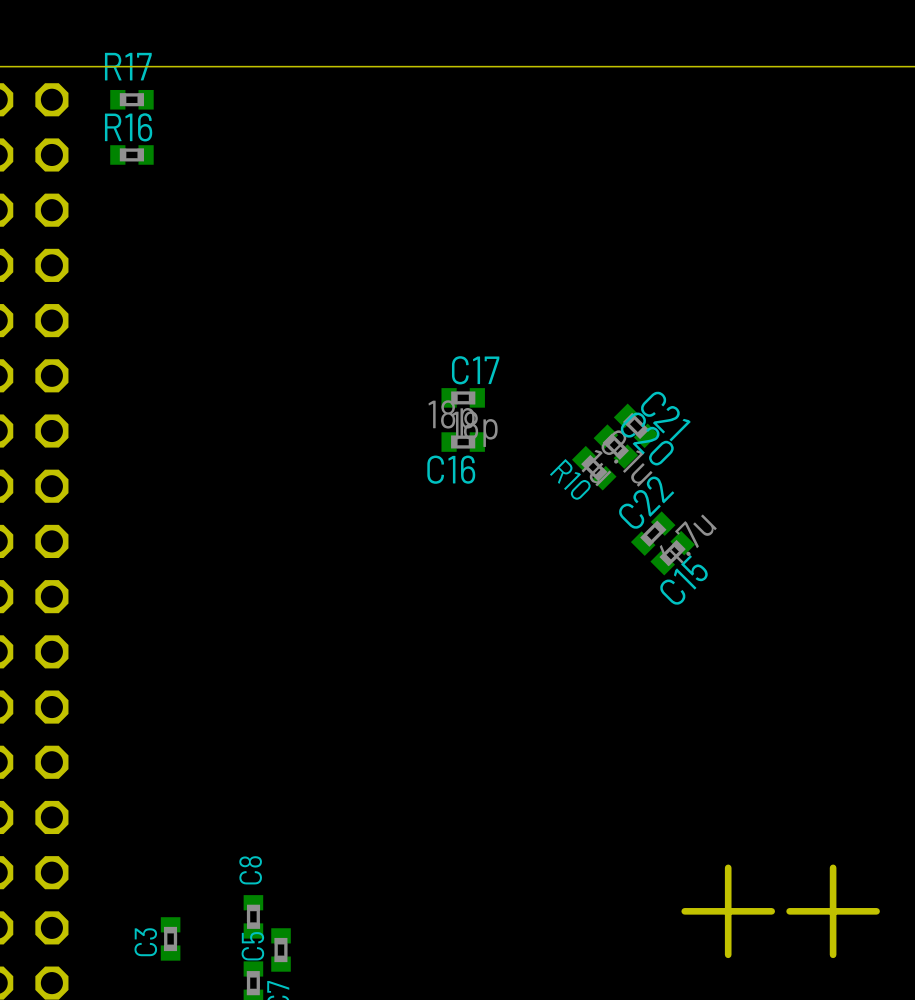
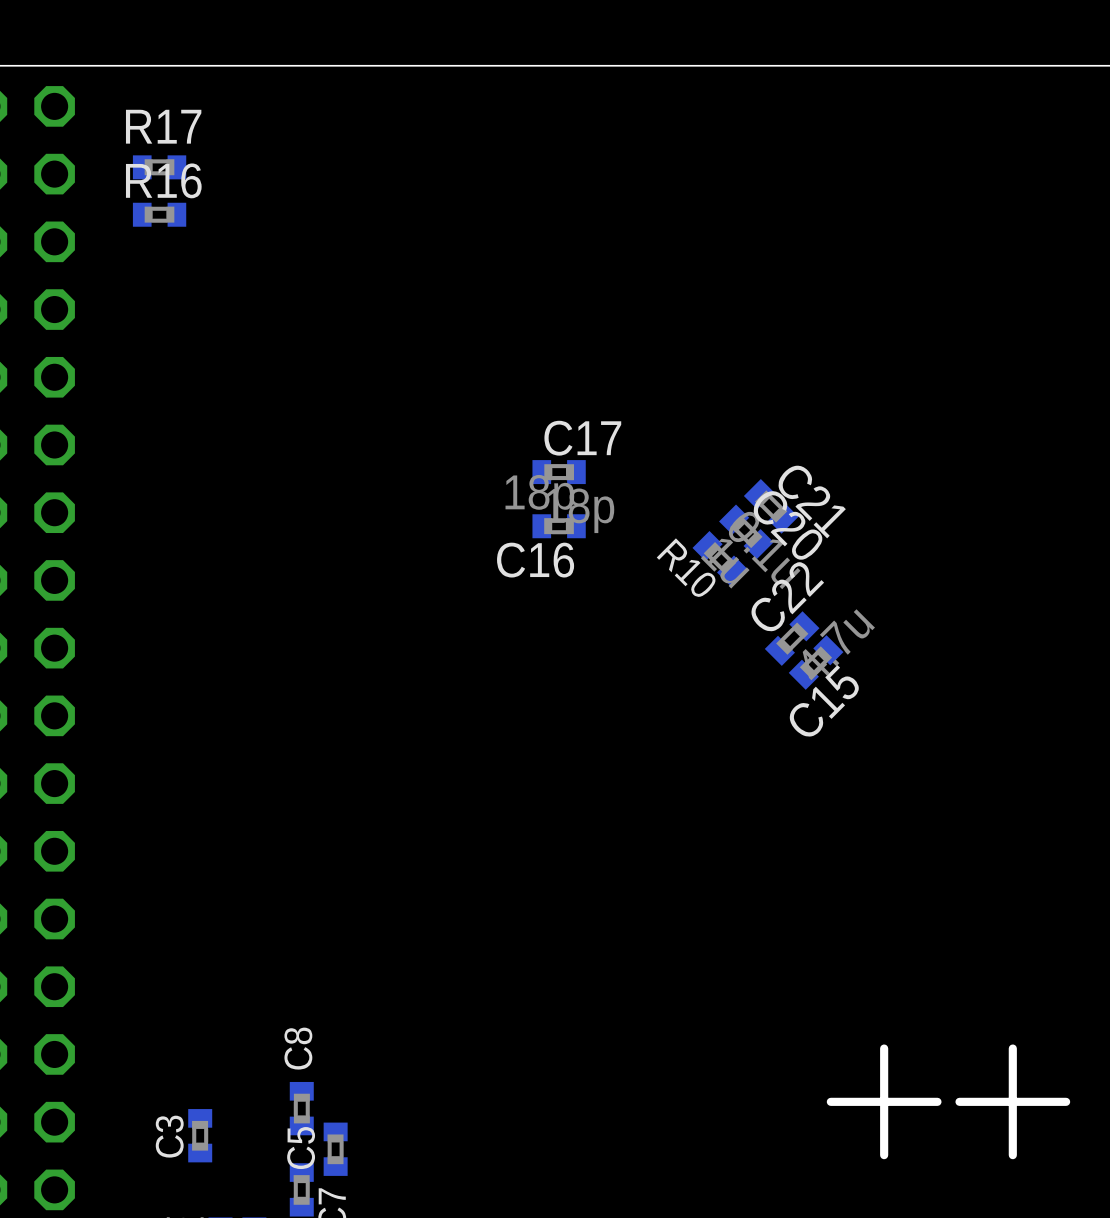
R17 position: (131, 99) -> (159, 167)
R16 position: (131, 154) -> (159, 214)

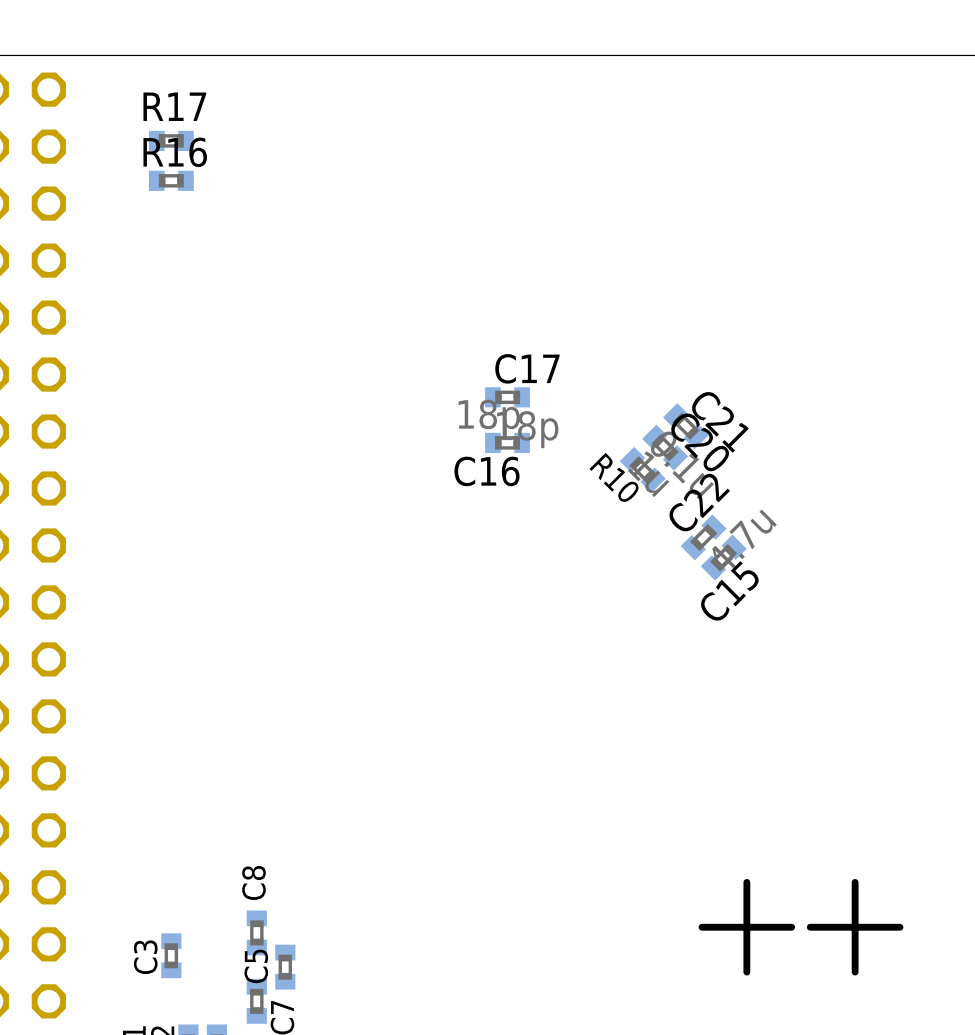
R17 position: (159, 167) -> (171, 140)
R16 position: (159, 214) -> (171, 180)
C17 position: (559, 472) -> (507, 397)
C21 position: (771, 506) -> (686, 426)
C16 position: (559, 526) -> (507, 442)
C20 position: (746, 531) -> (665, 447)
R10 position: (719, 558) -> (642, 469)
C22 position: (792, 638) -> (703, 537)
C15 position: (816, 662) -> (723, 557)

